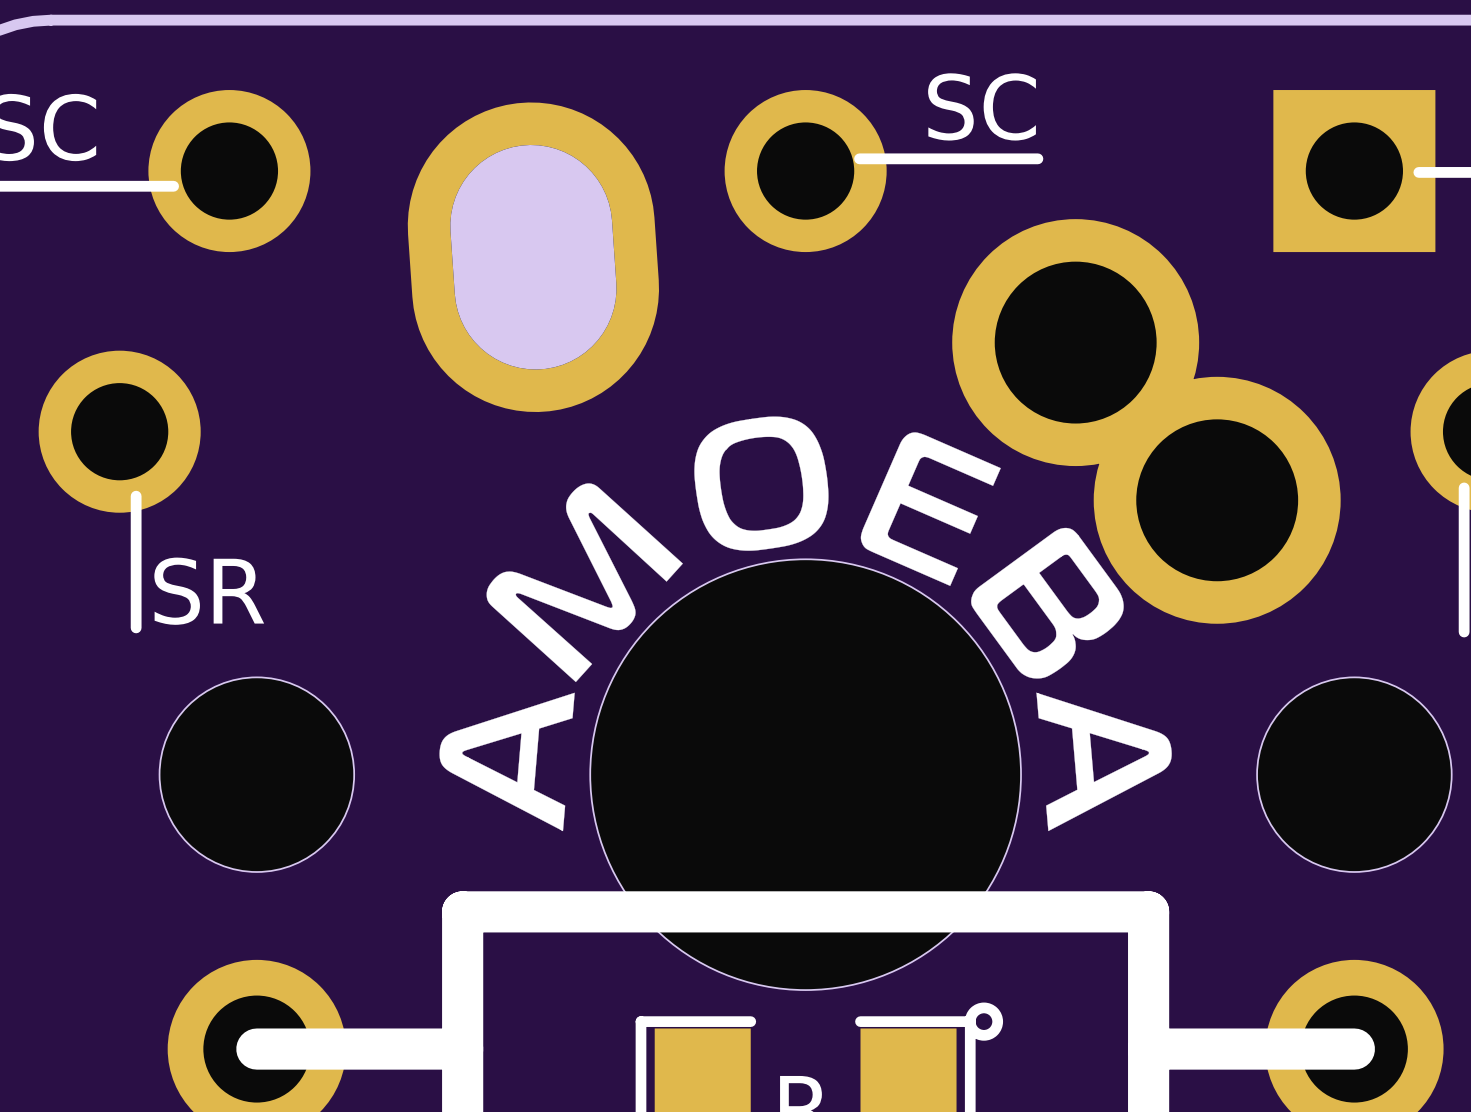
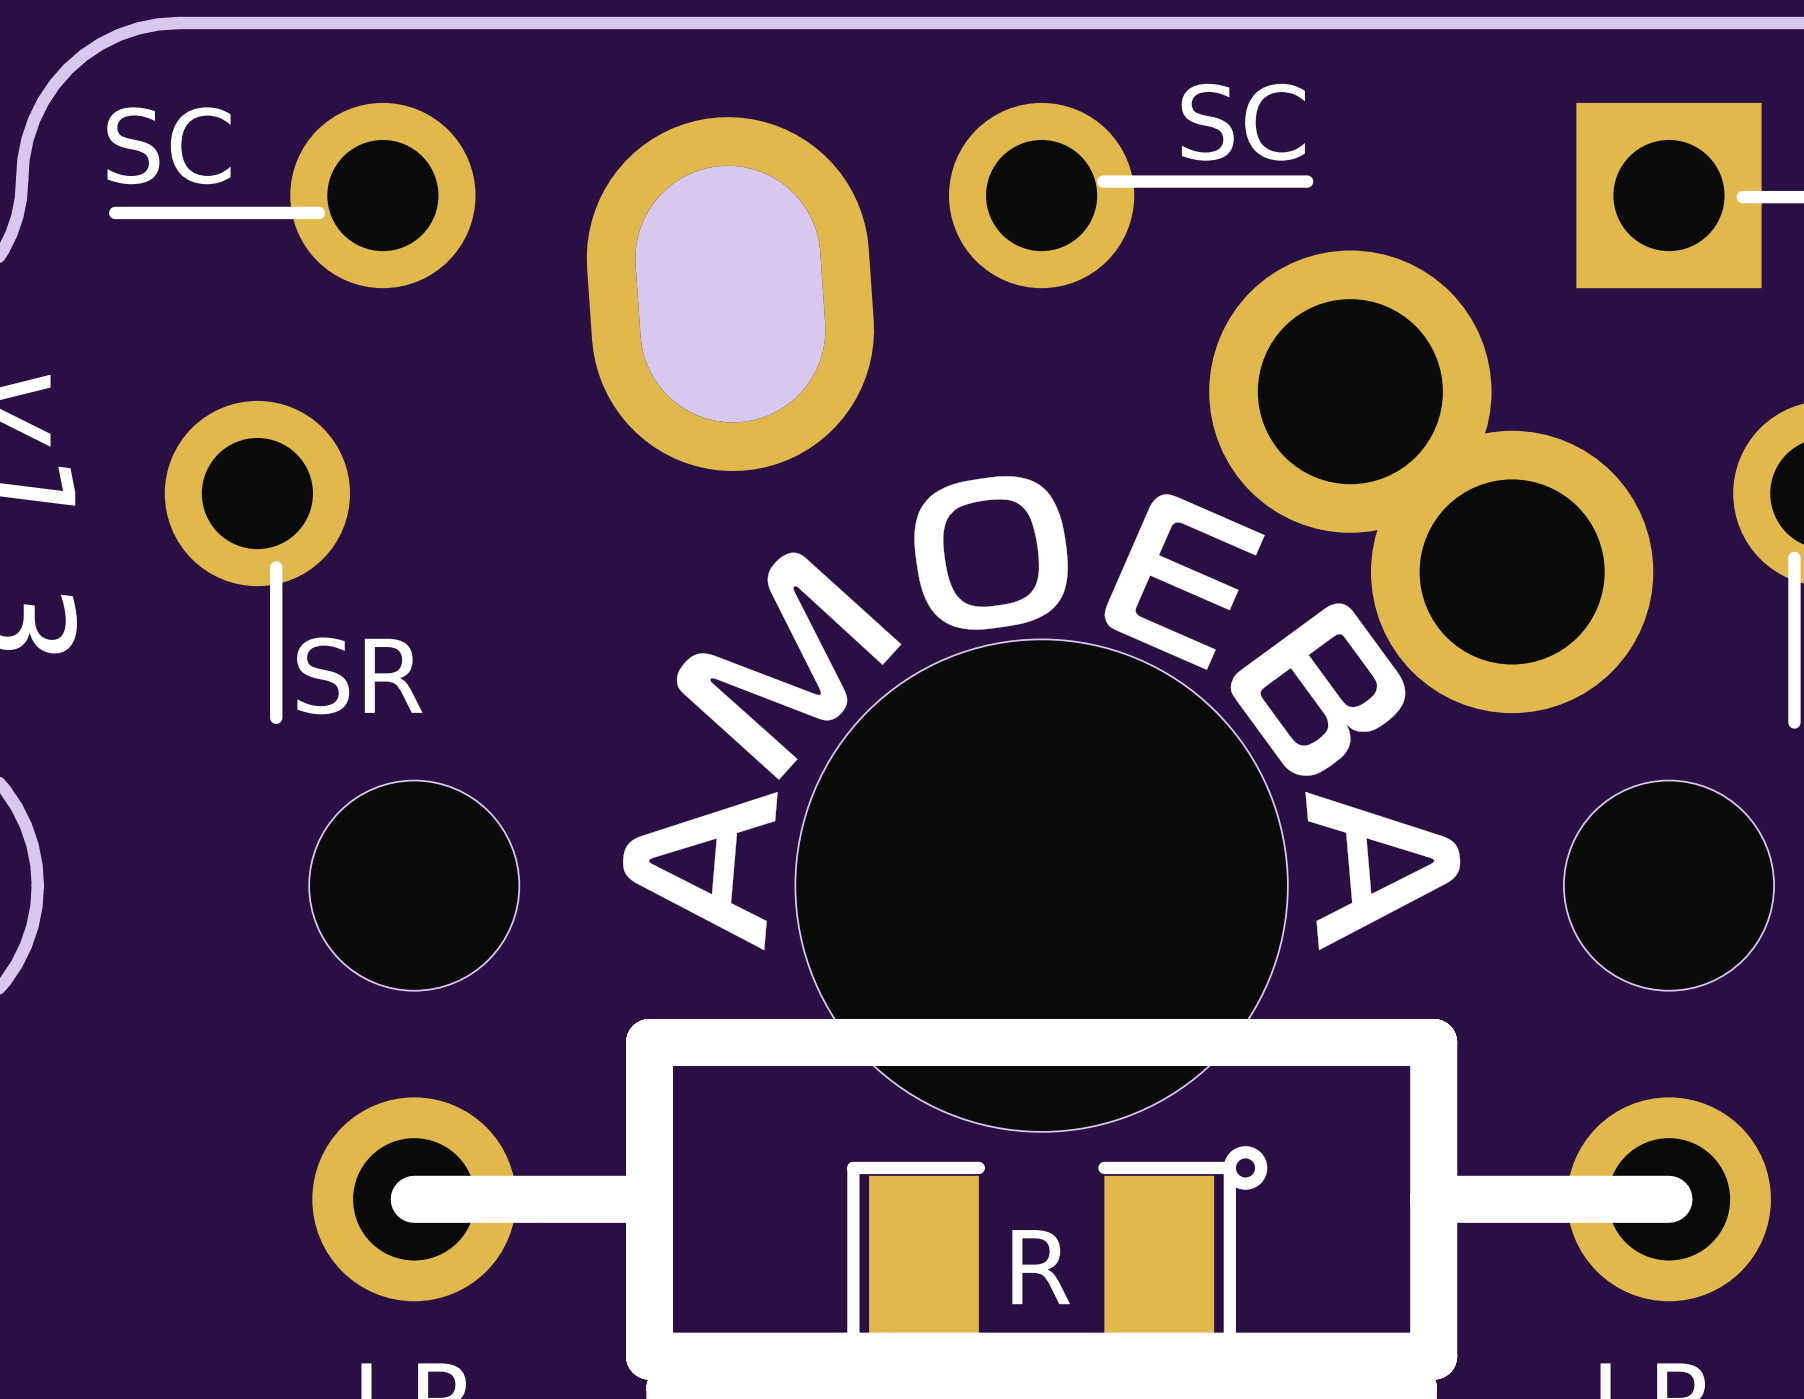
part footprint: [159, 102, 1452, 991] -> [309, 117, 1775, 1132]

